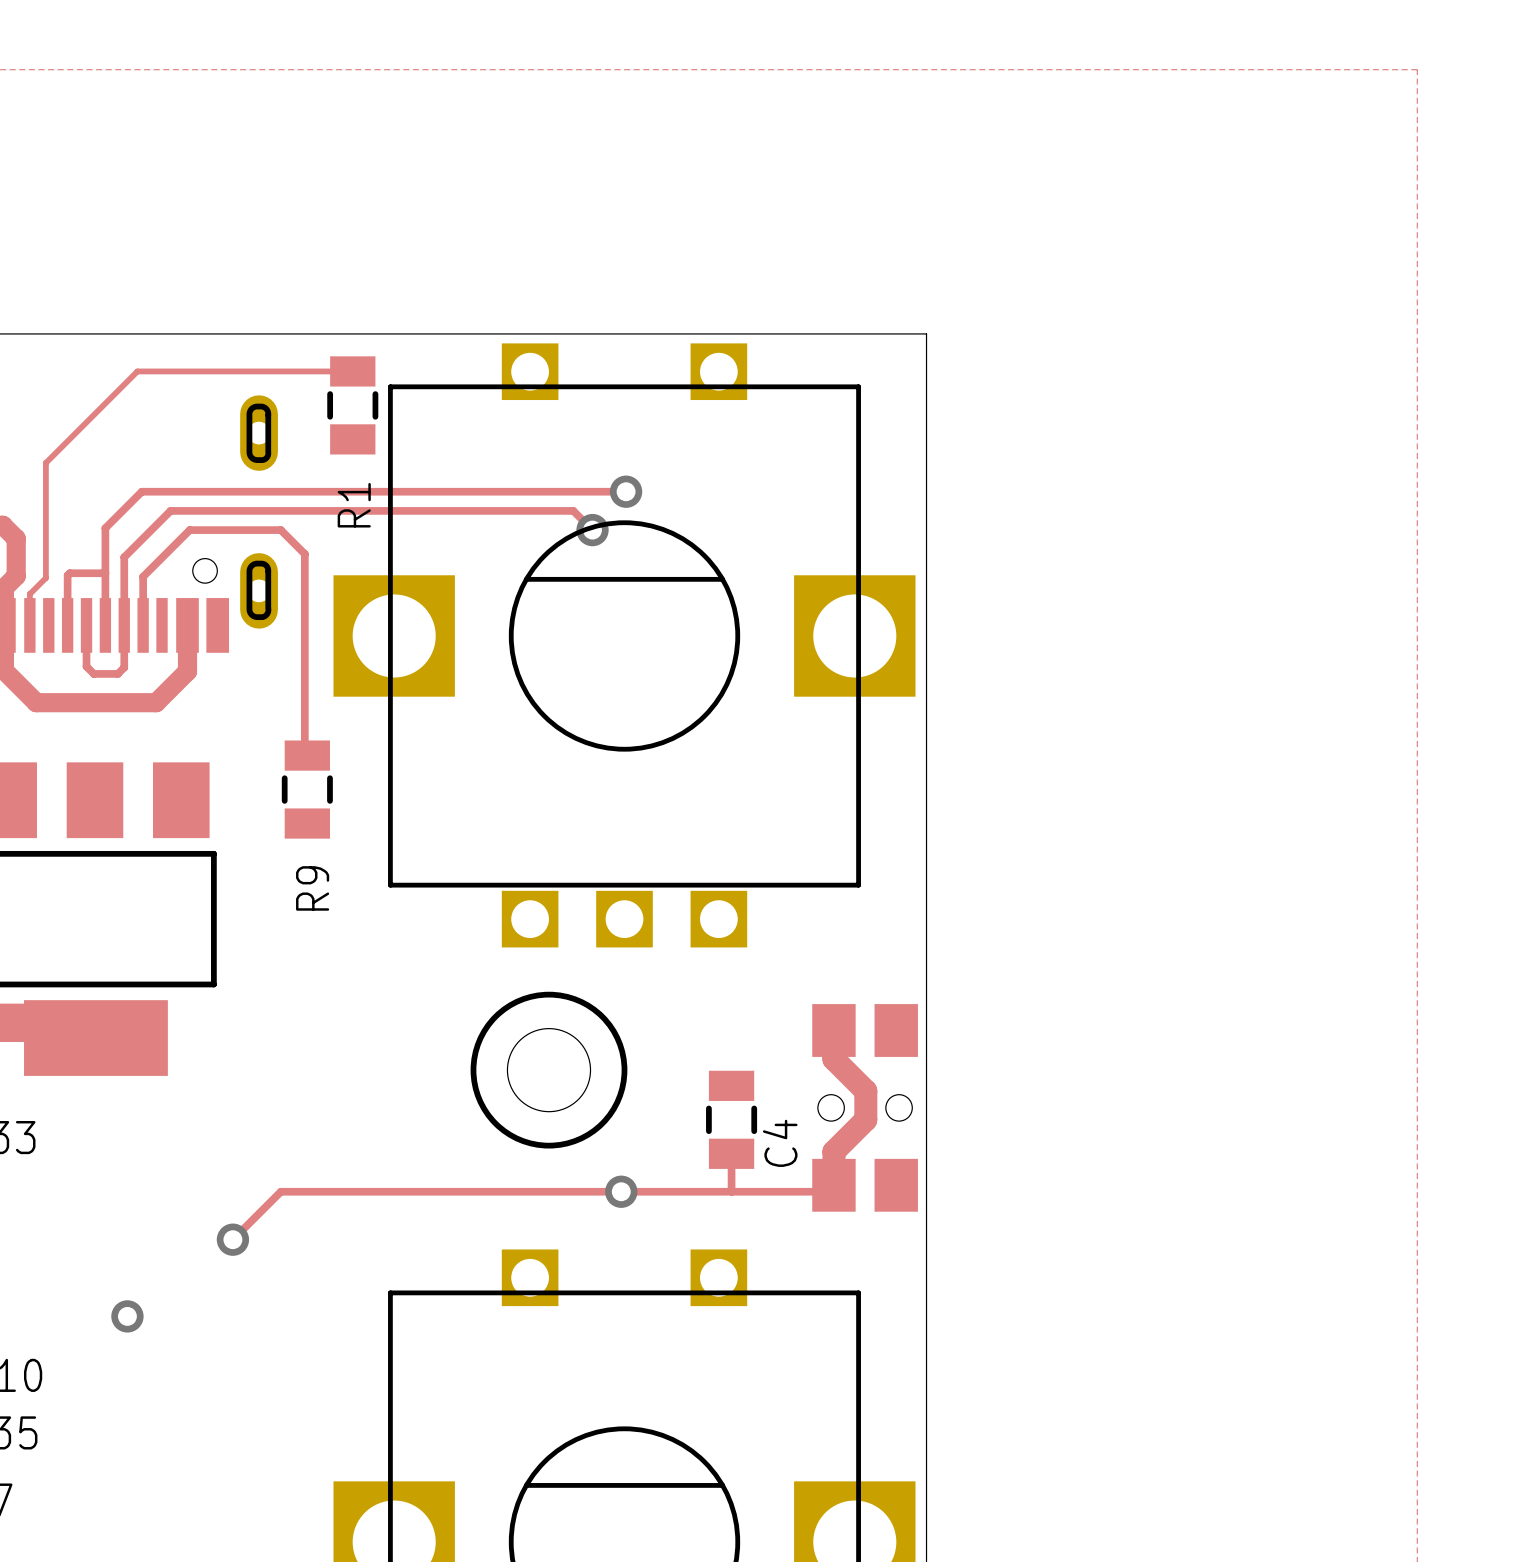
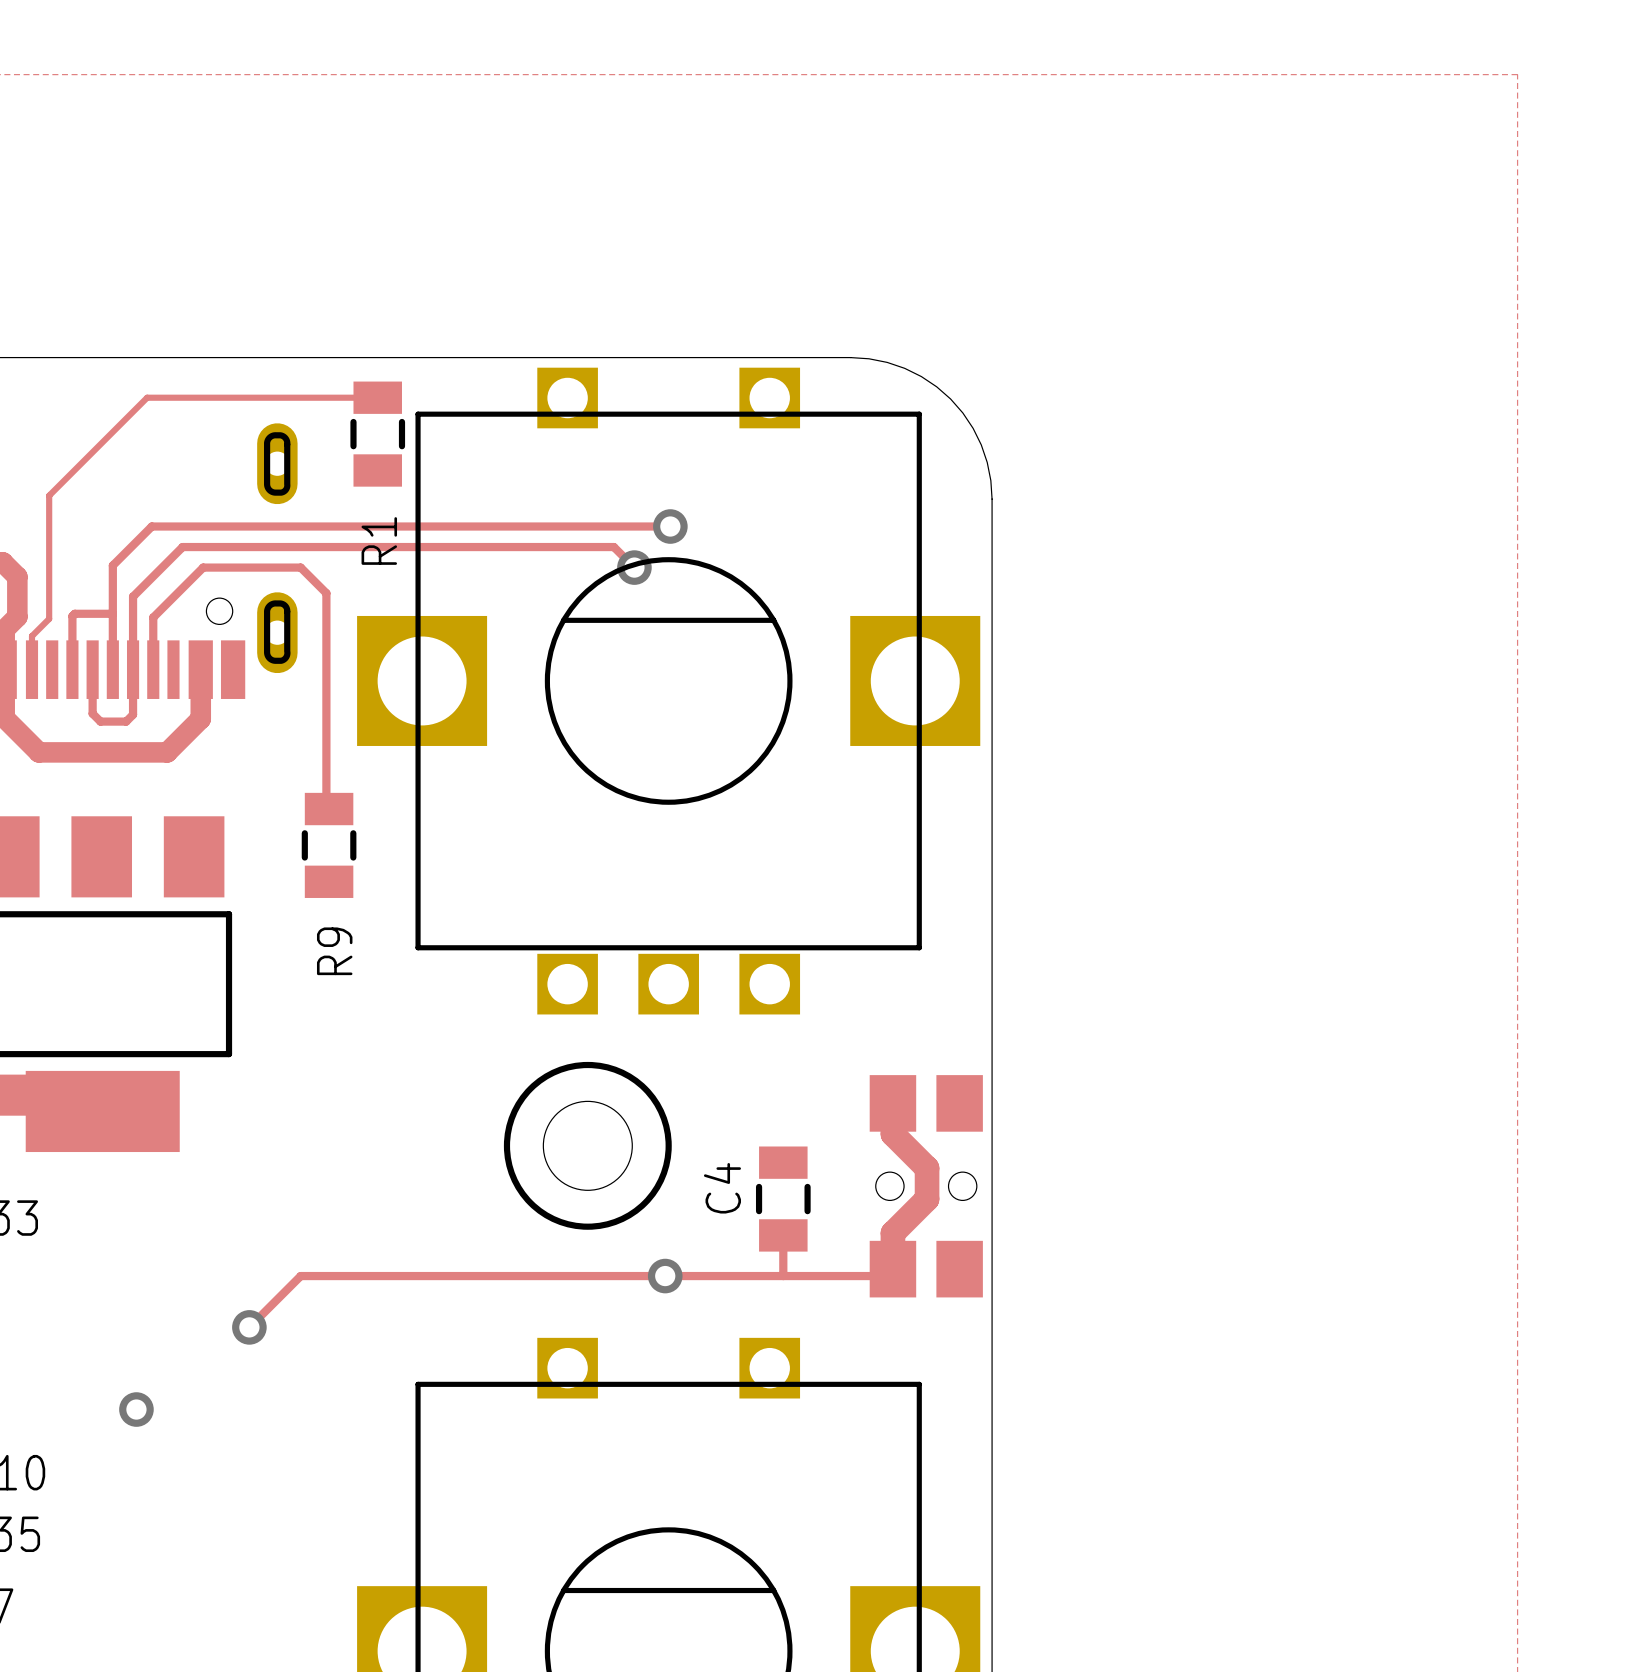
board edge: (794, 333) (926, 333) (926, 466) -> (850, 357) (869, 358) (904, 368) (921, 376) (950, 399) (973, 428) (981, 444) (990, 480) (992, 499)
C4 name position: C4 (780, 1143) -> C4 (722, 1188)

